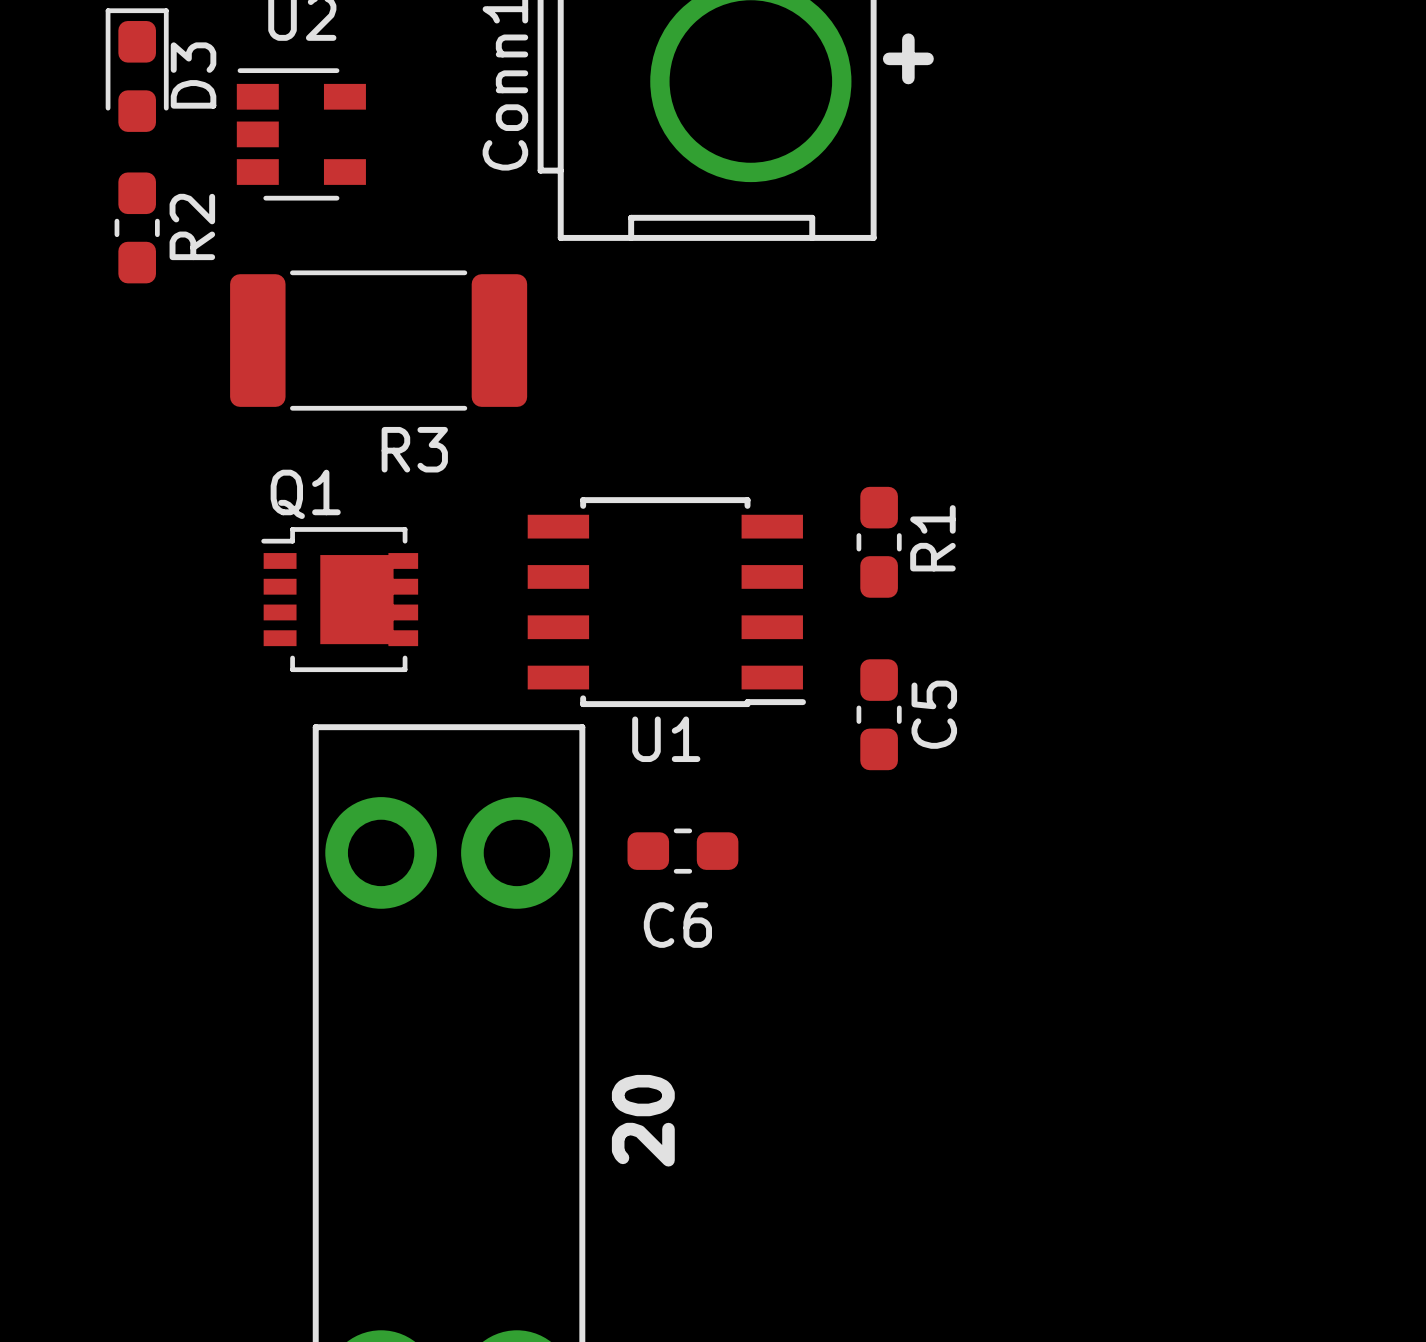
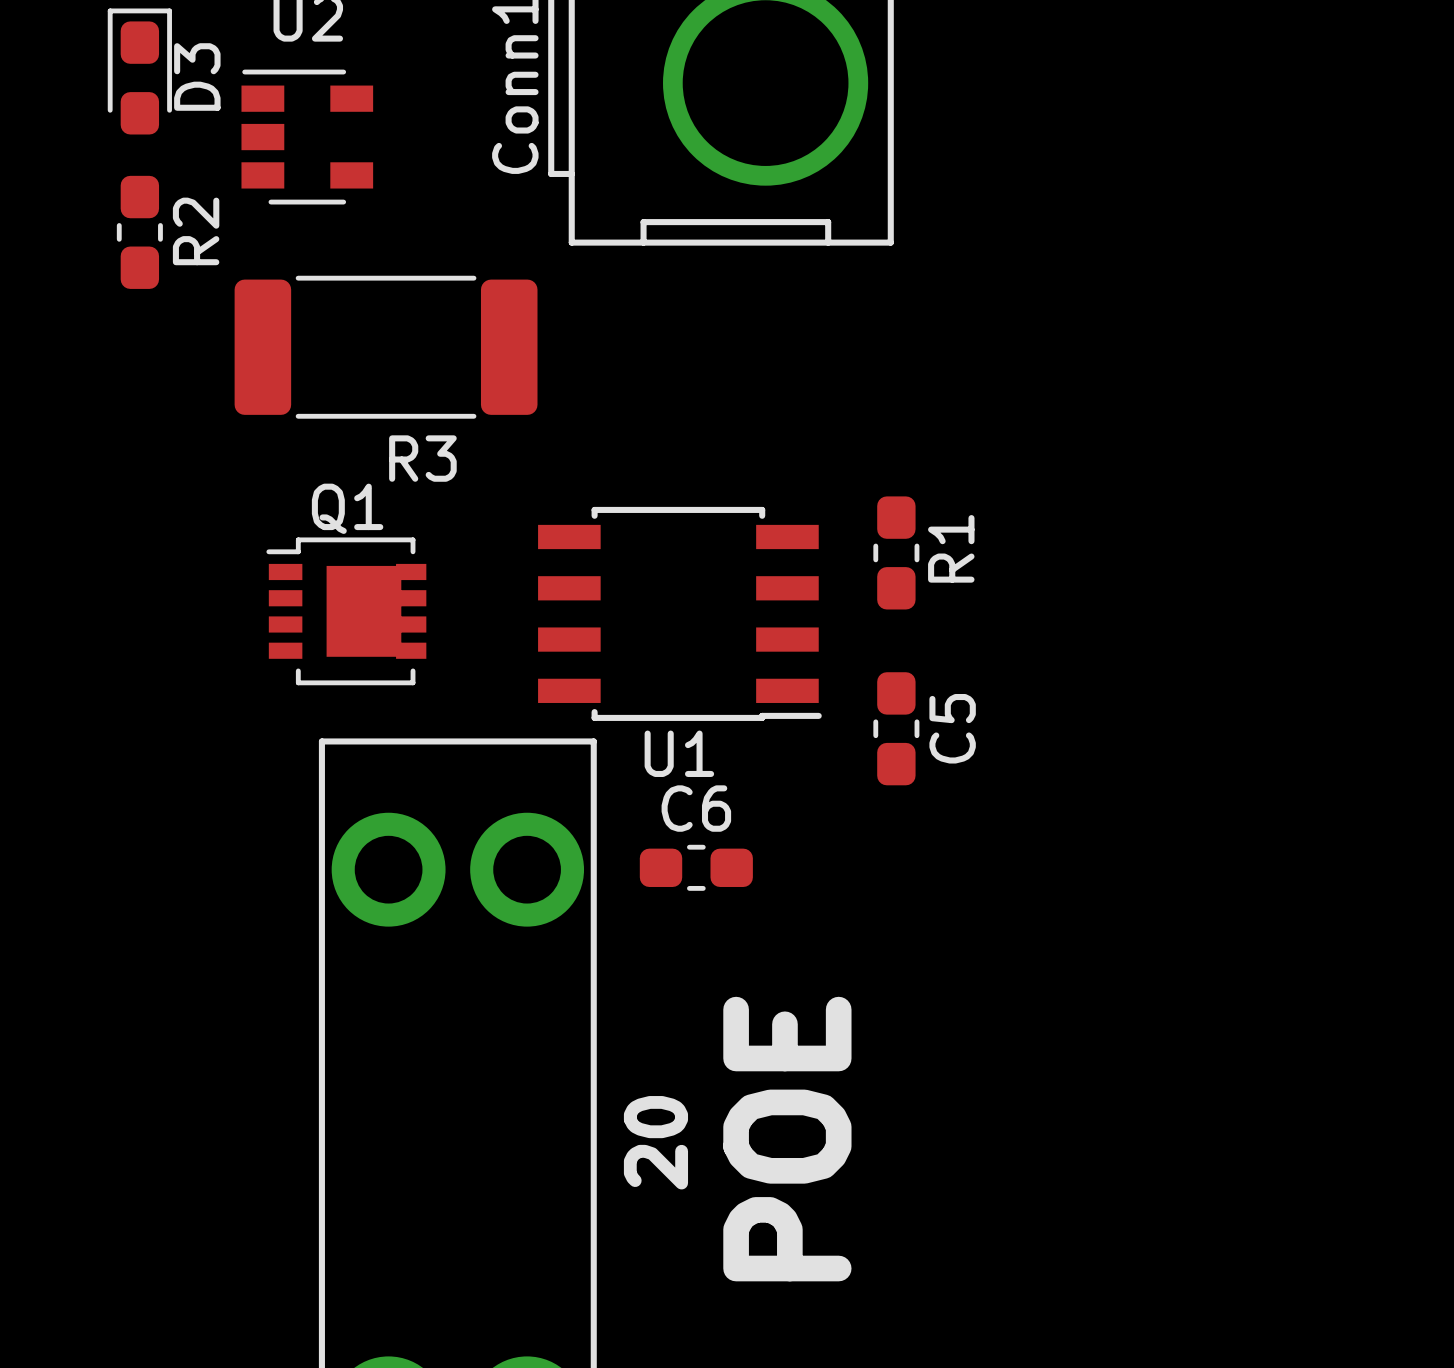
text: + (908, 58) -> none
Q1 name position: Q1 (305, 494) -> Q1 (347, 508)
C6 name position: C6 (677, 925) -> C6 (696, 808)
text: none -> POE (787, 1139)

